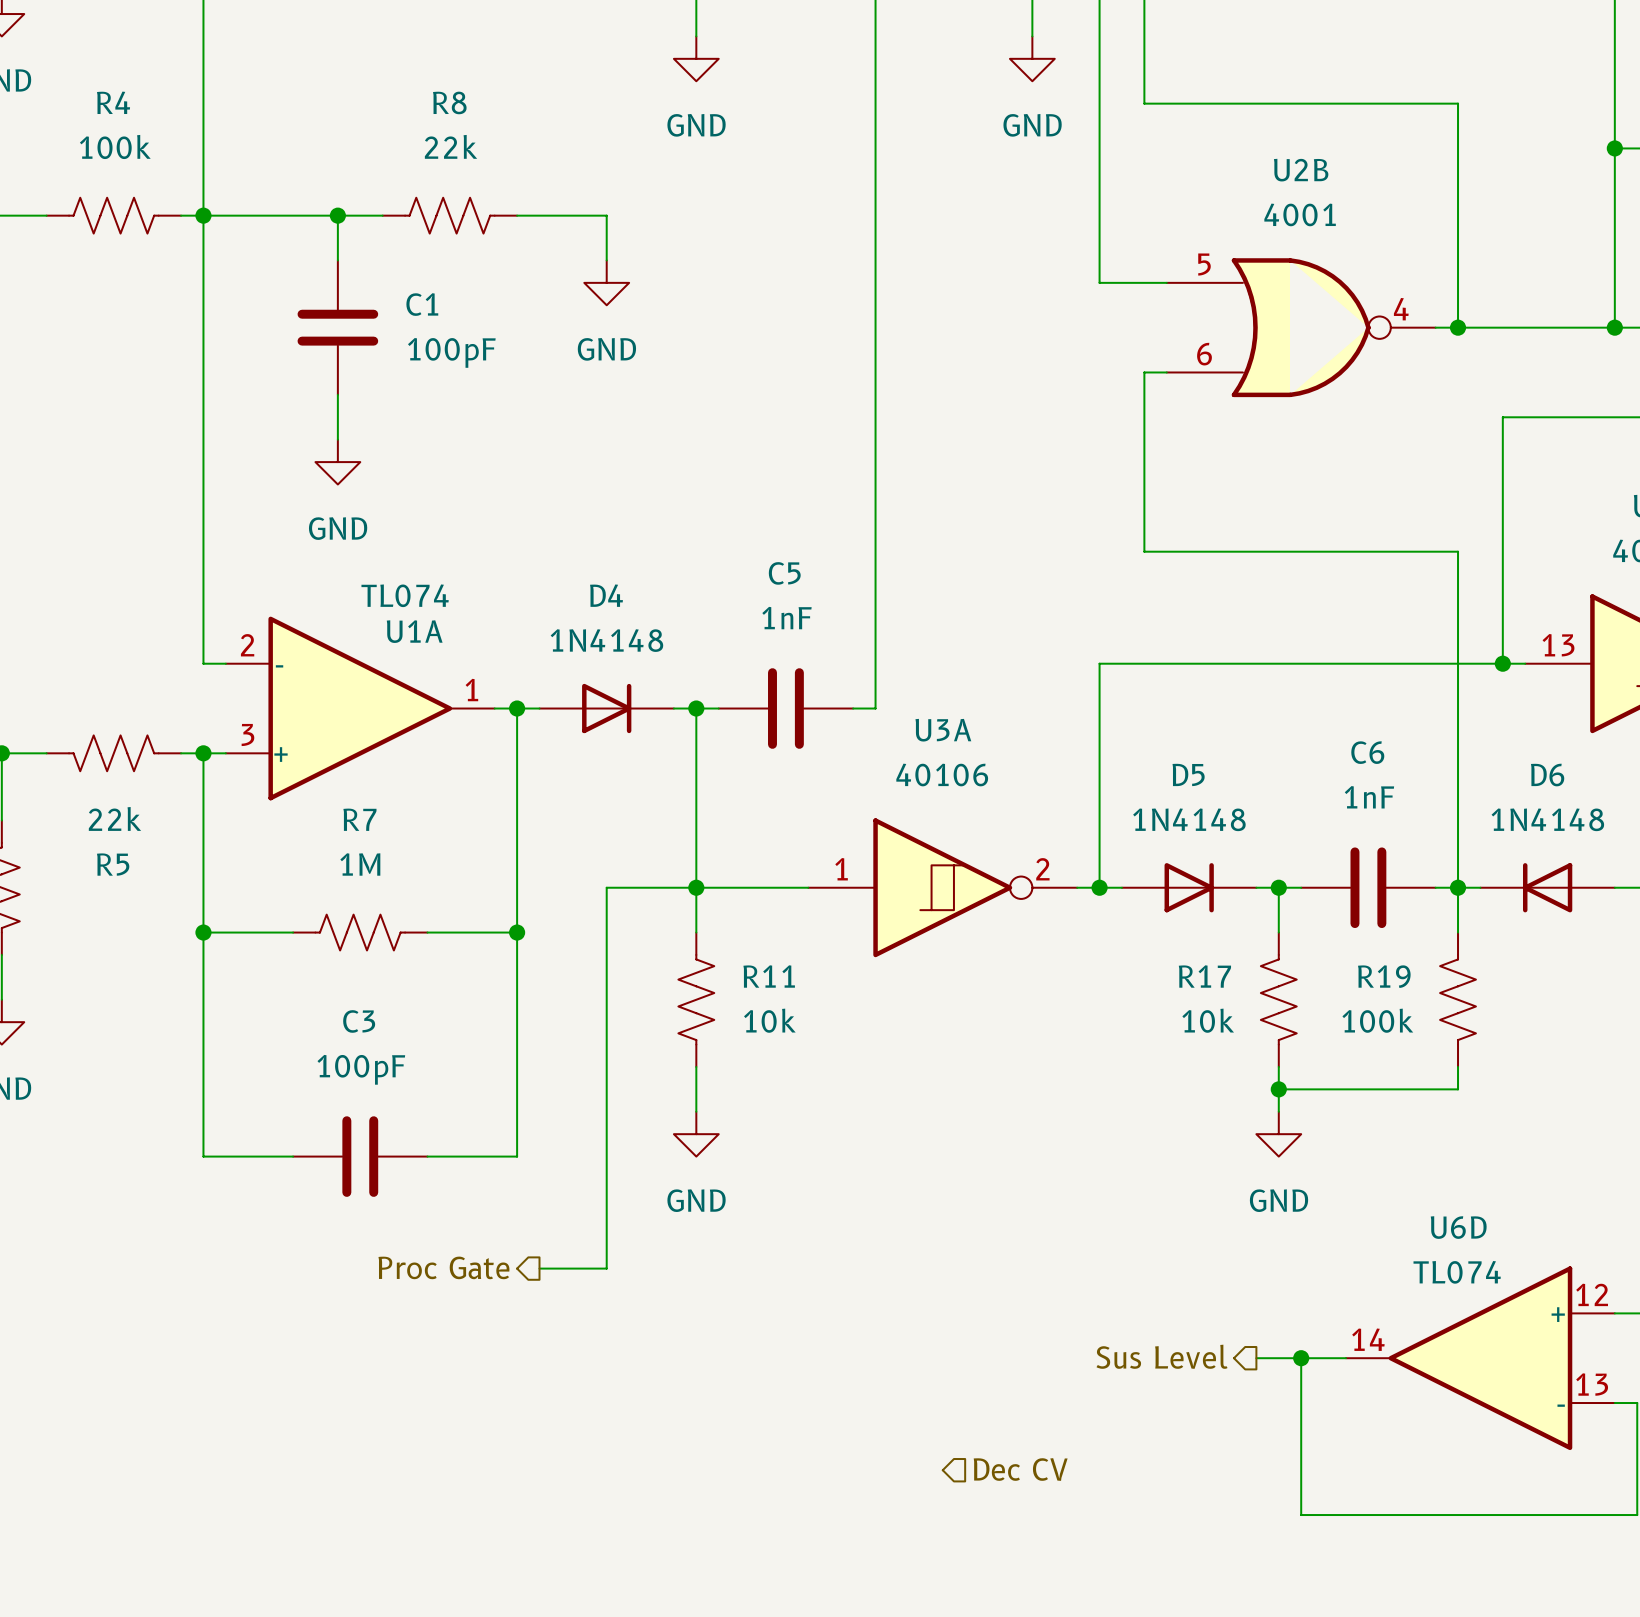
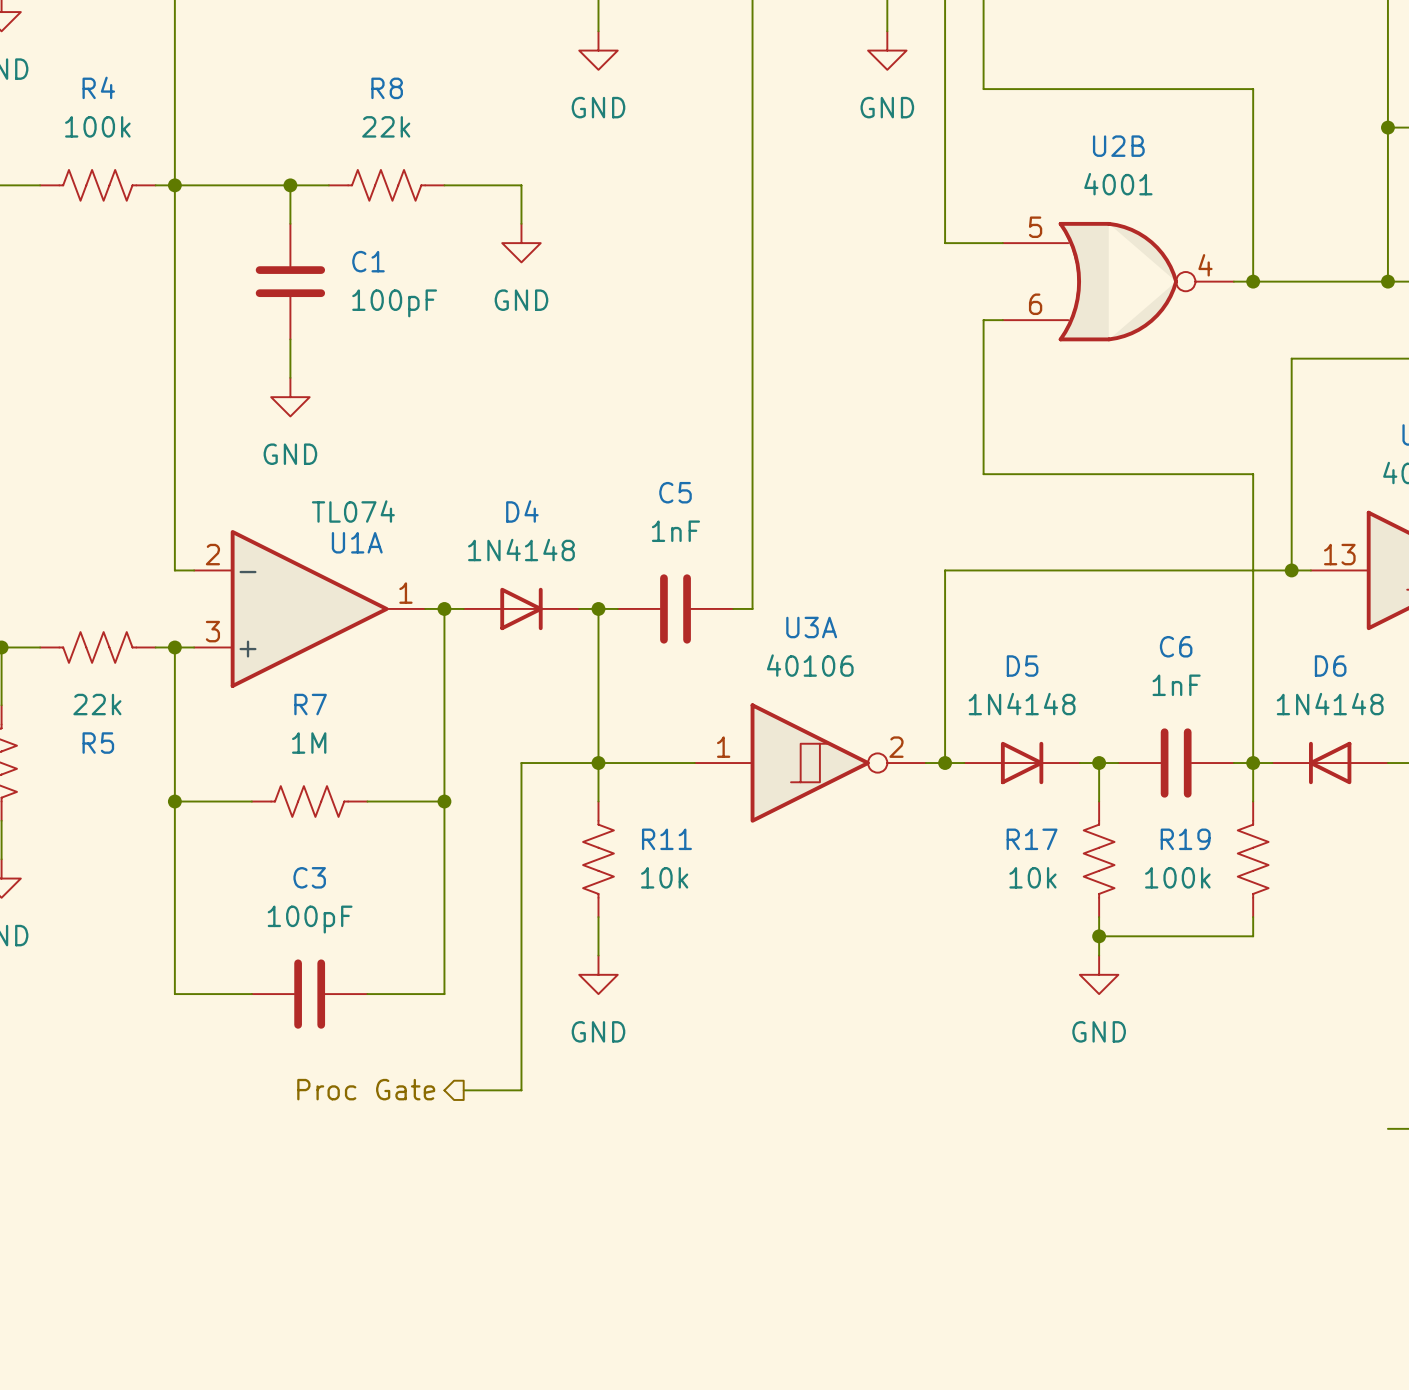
hierarchical label: Sus Level (1162, 1356) -> none
wire: (1256, 1358) (1346, 1358) -> none
wire: (1301, 1358) (1301, 1515) (1637, 1515) (1637, 1403) (1614, 1403) -> none
junction: (1301, 1358) -> none
U6D: TL074 (1480, 1358) -> none
hierarchical label: Dec CV (1020, 1469) -> none

